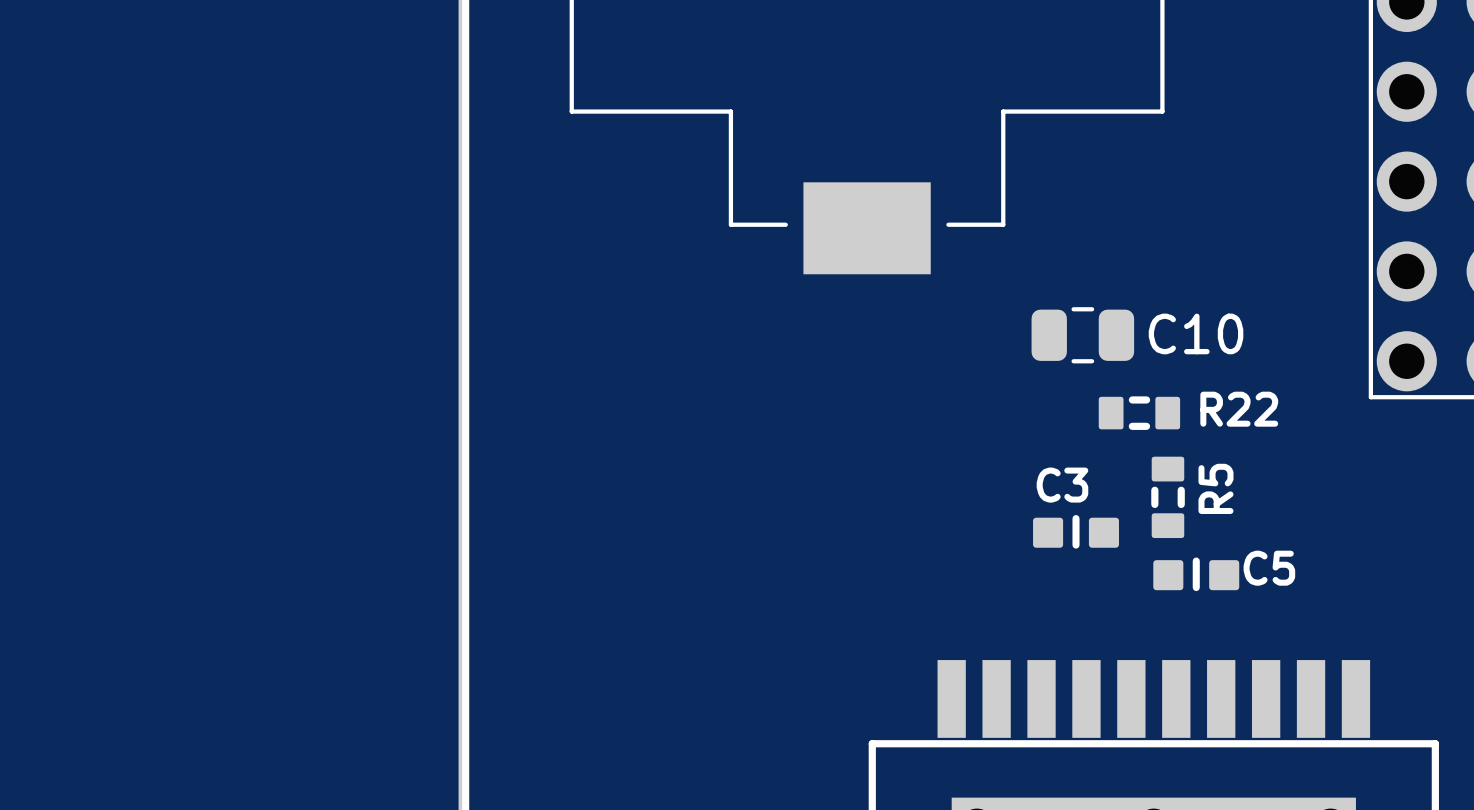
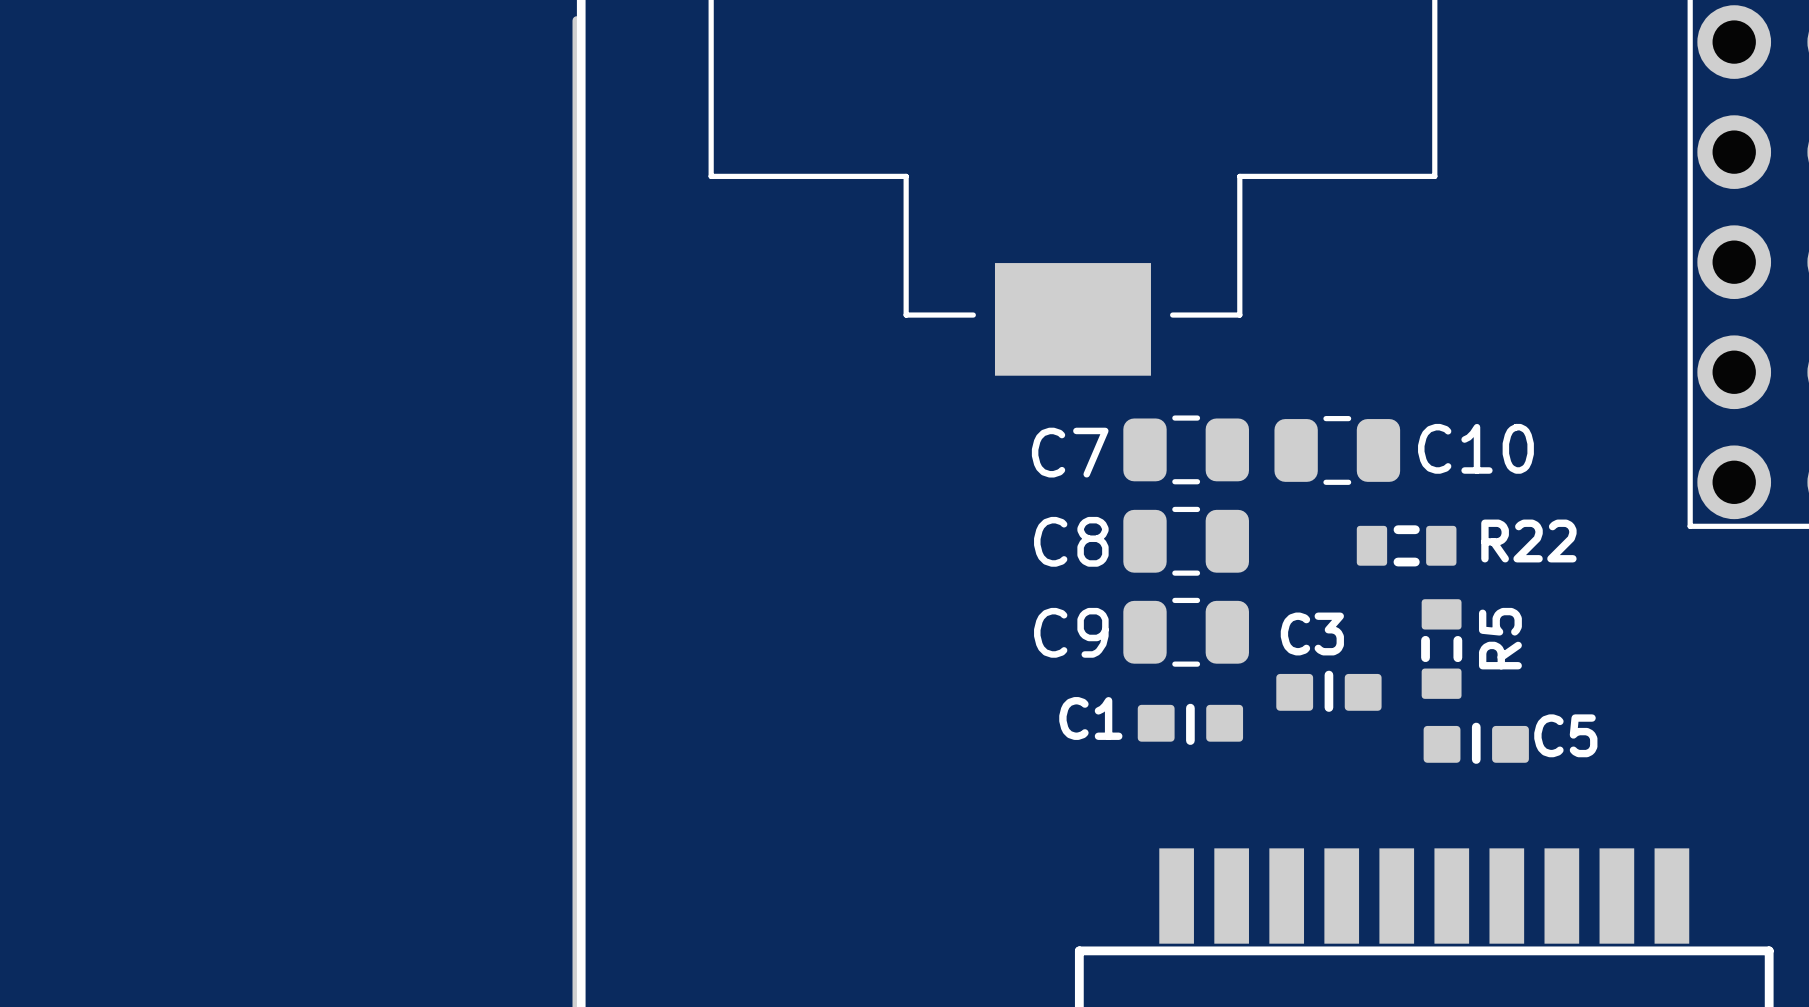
C7: none -> (1186, 449)
C8: none -> (1186, 541)
C9: none -> (1186, 632)
C1: none -> (1190, 724)

